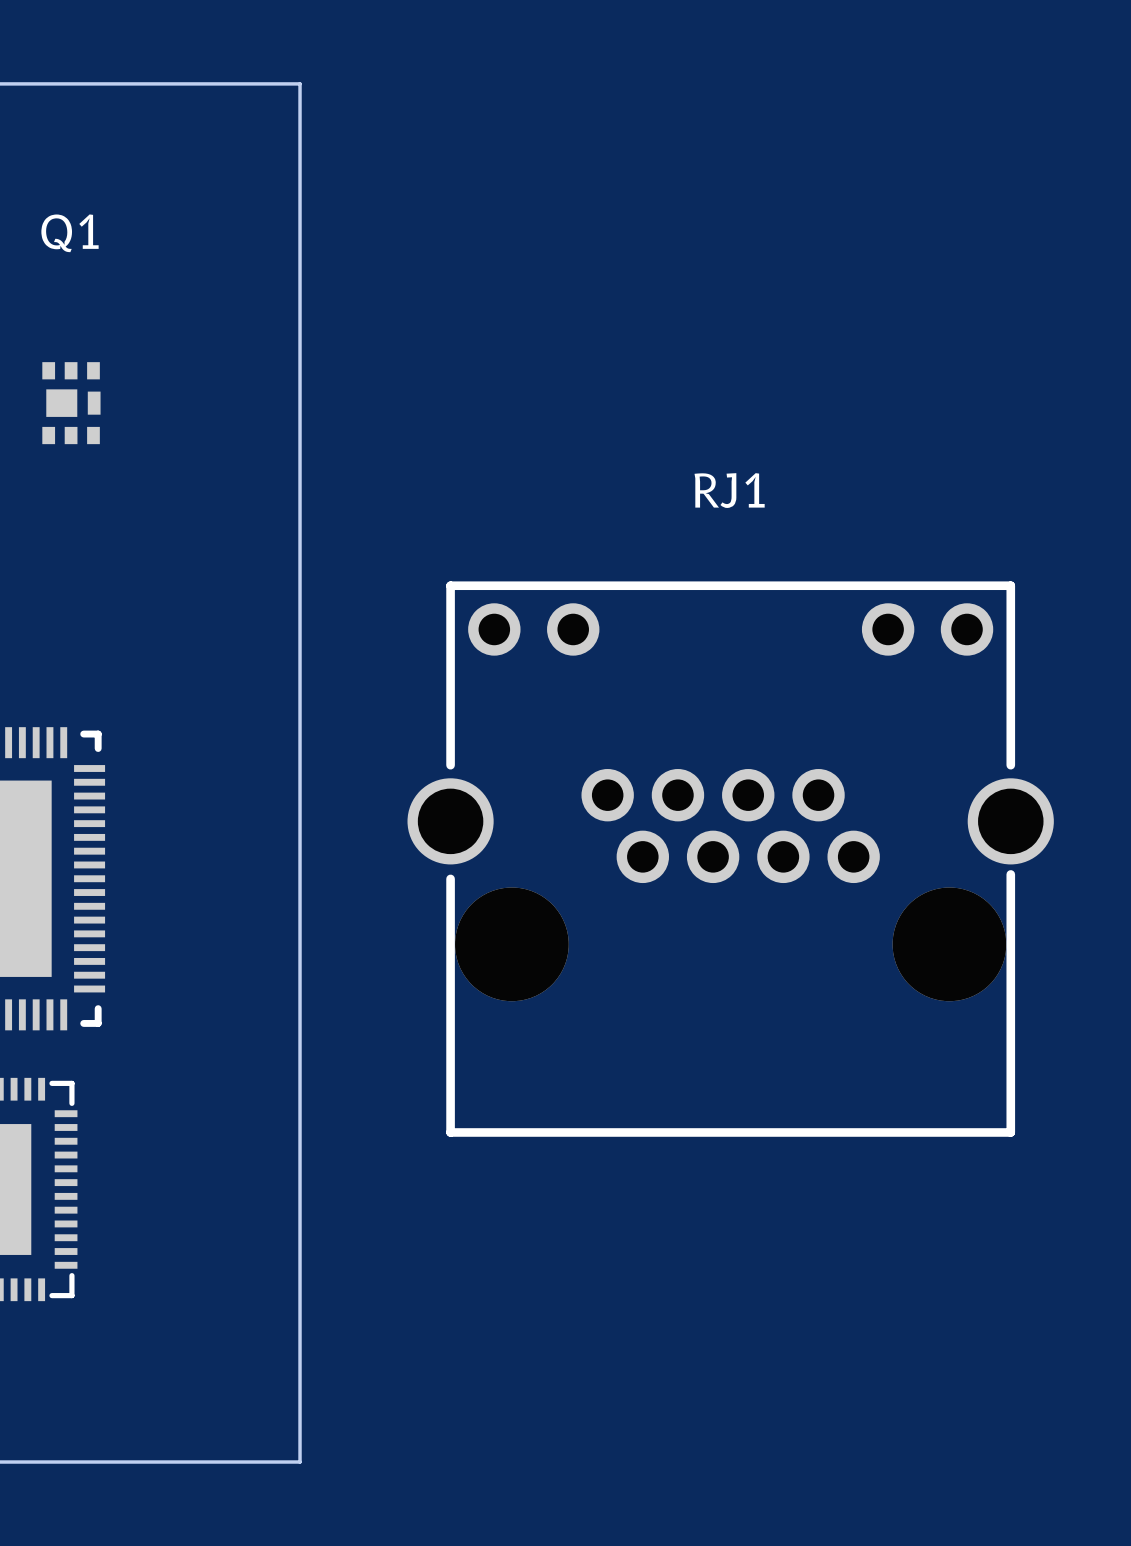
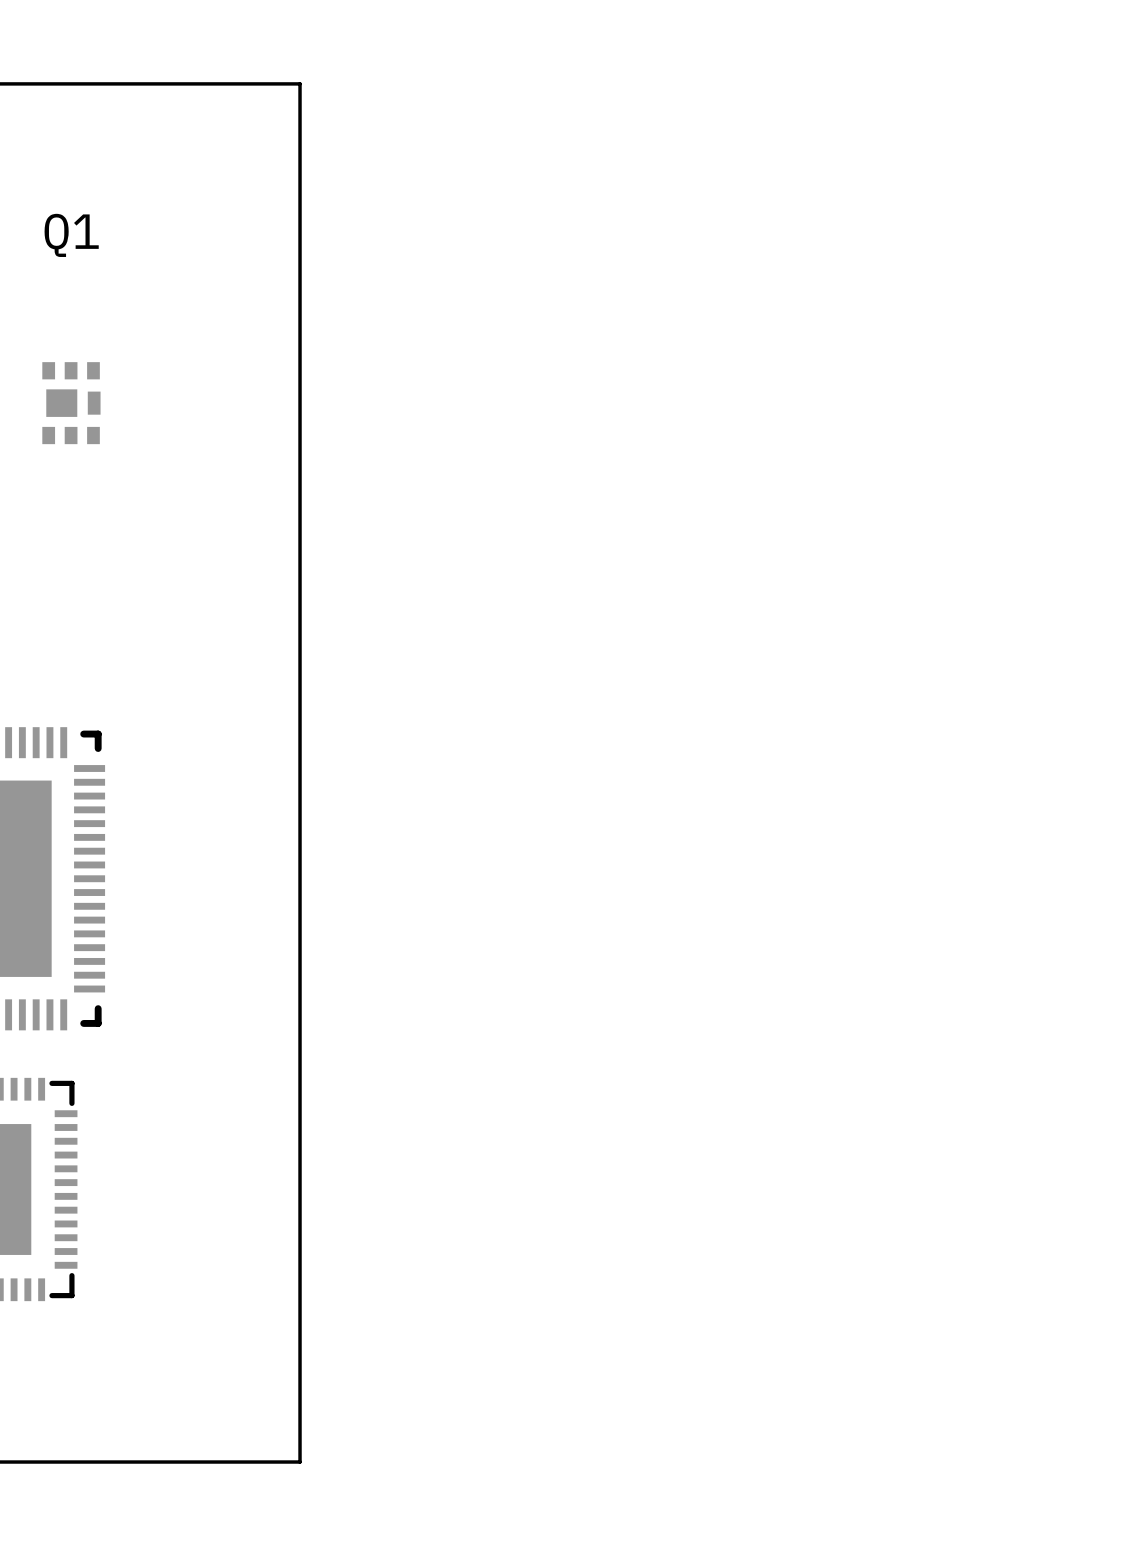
RJ1: (730, 859) -> none

